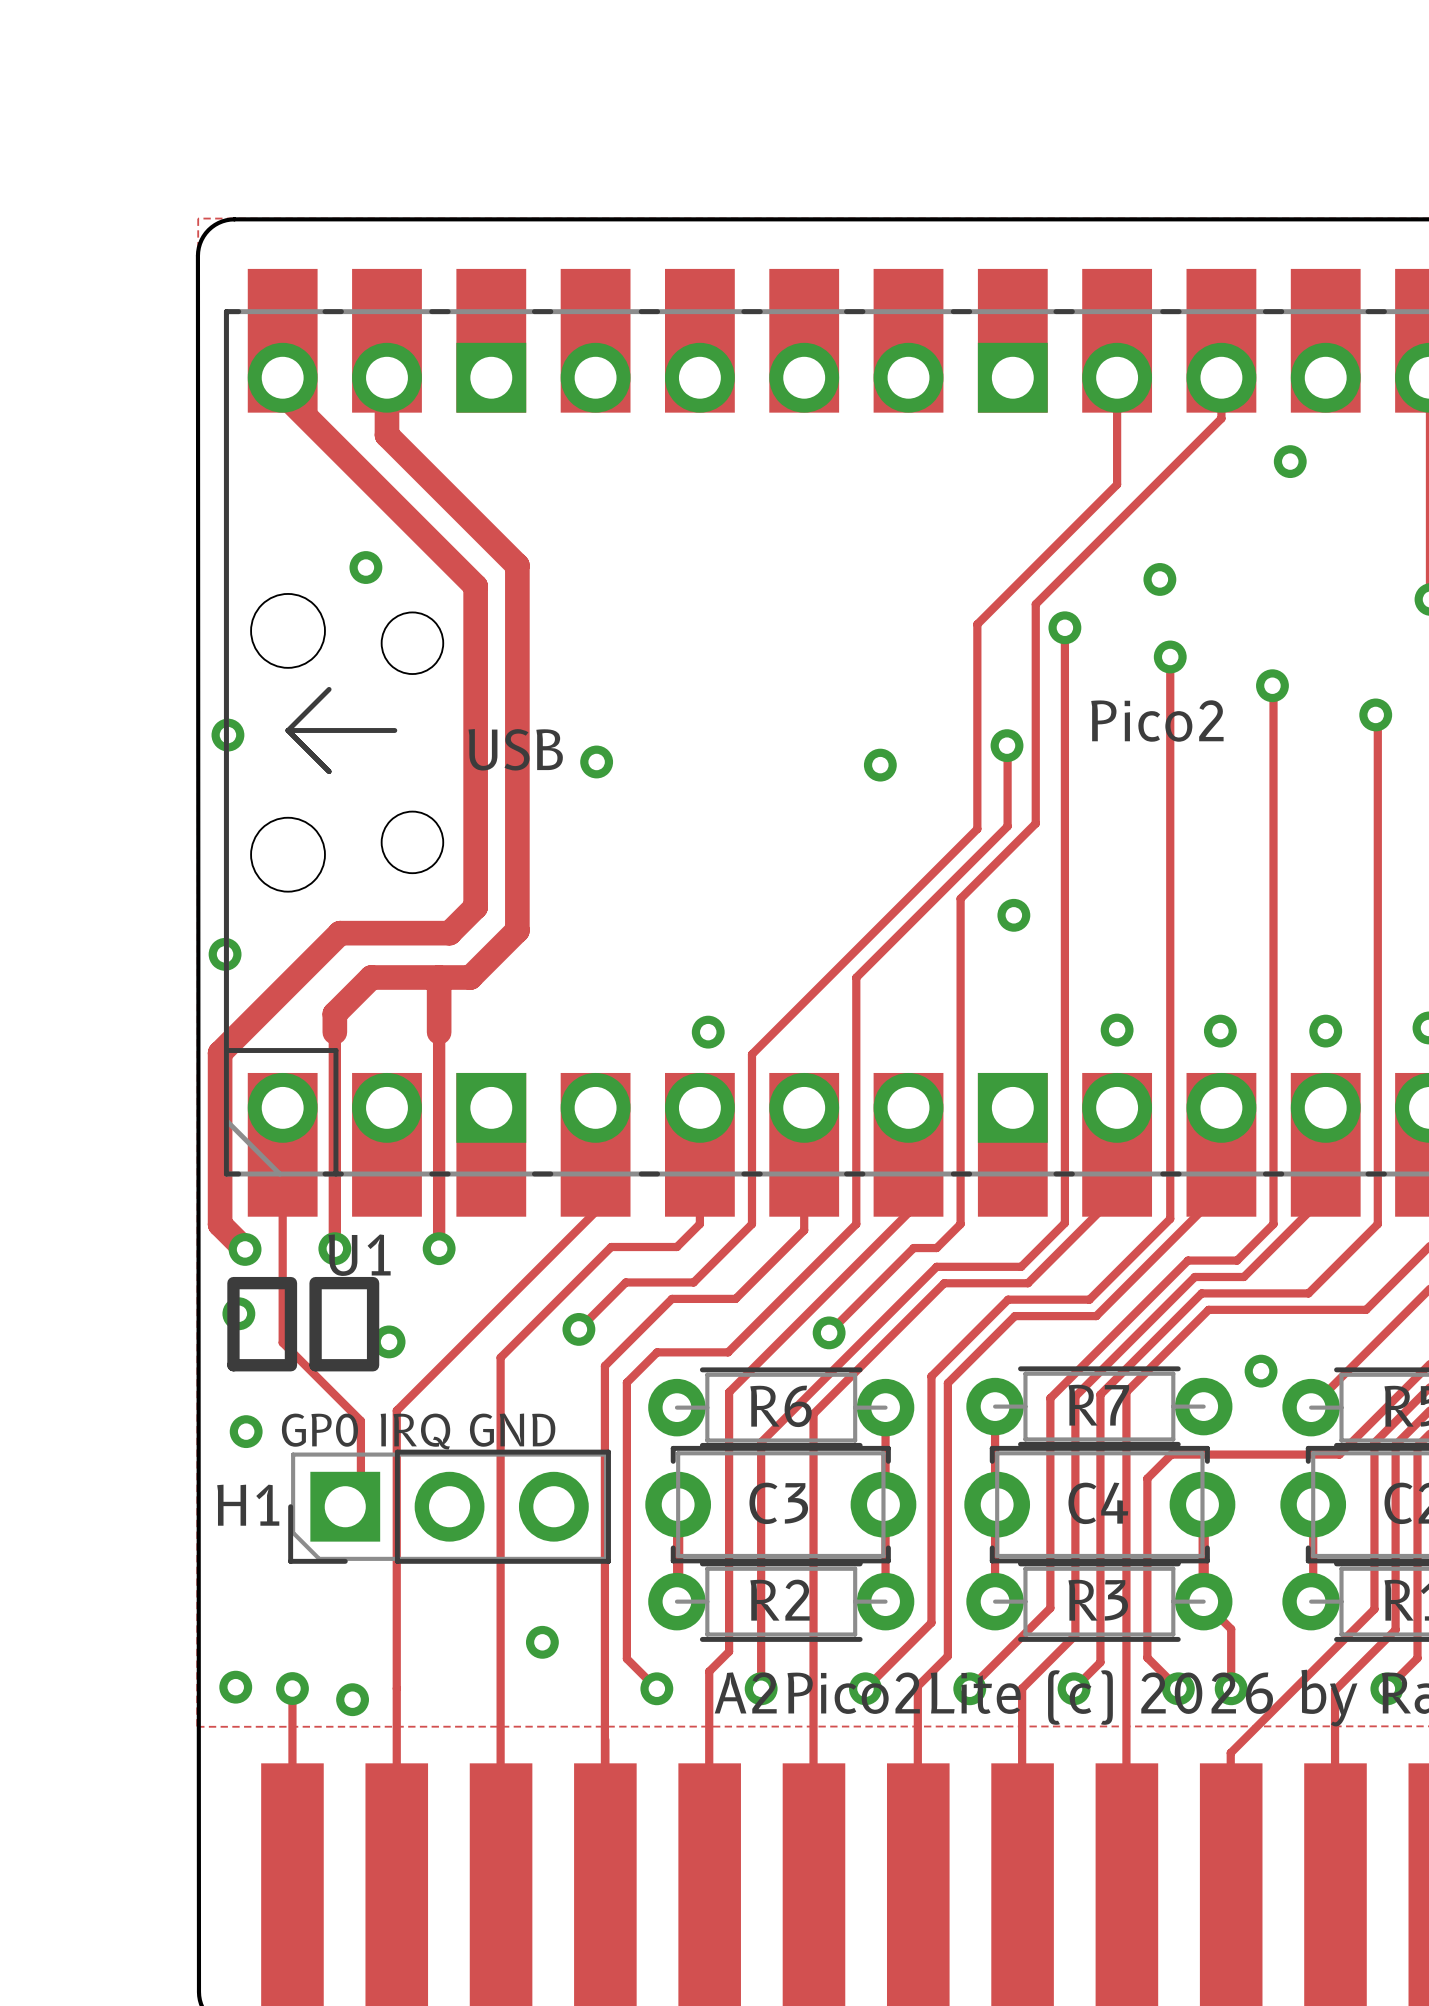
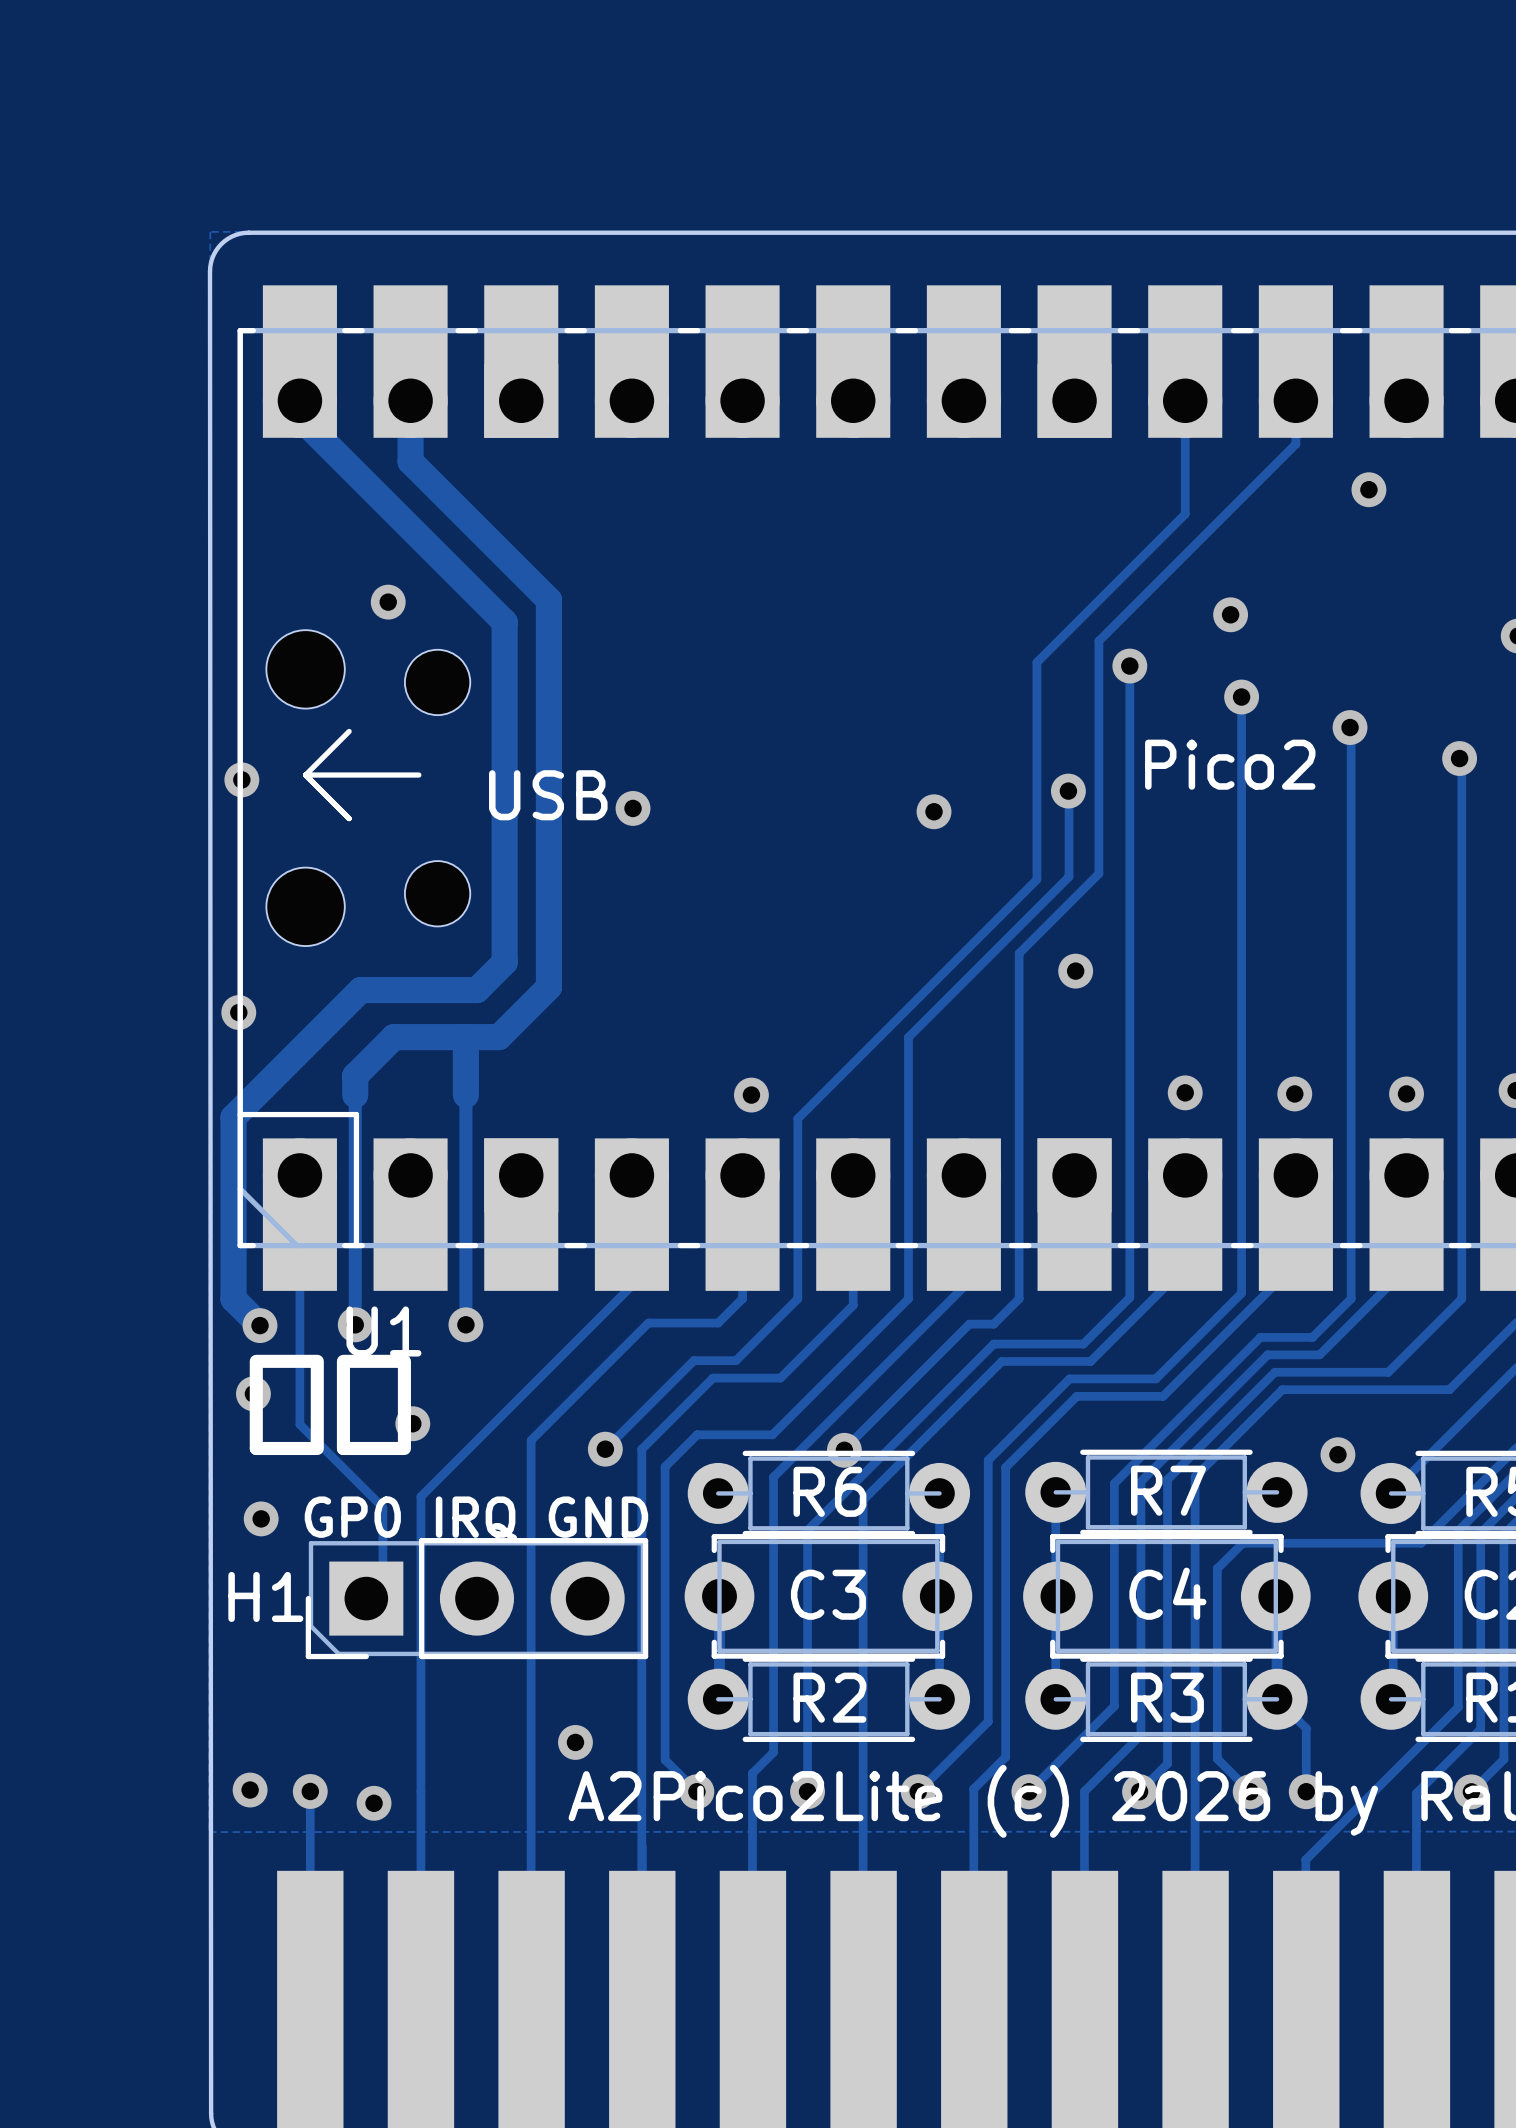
track: (654, 1282) (625, 1282) (578, 1329) -> (693, 1360) (605, 1449)
via position: (578, 1329) -> (605, 1449)
track: none -> (879, 1413) (844, 1450)
via position: (829, 1332) -> (844, 1450)

